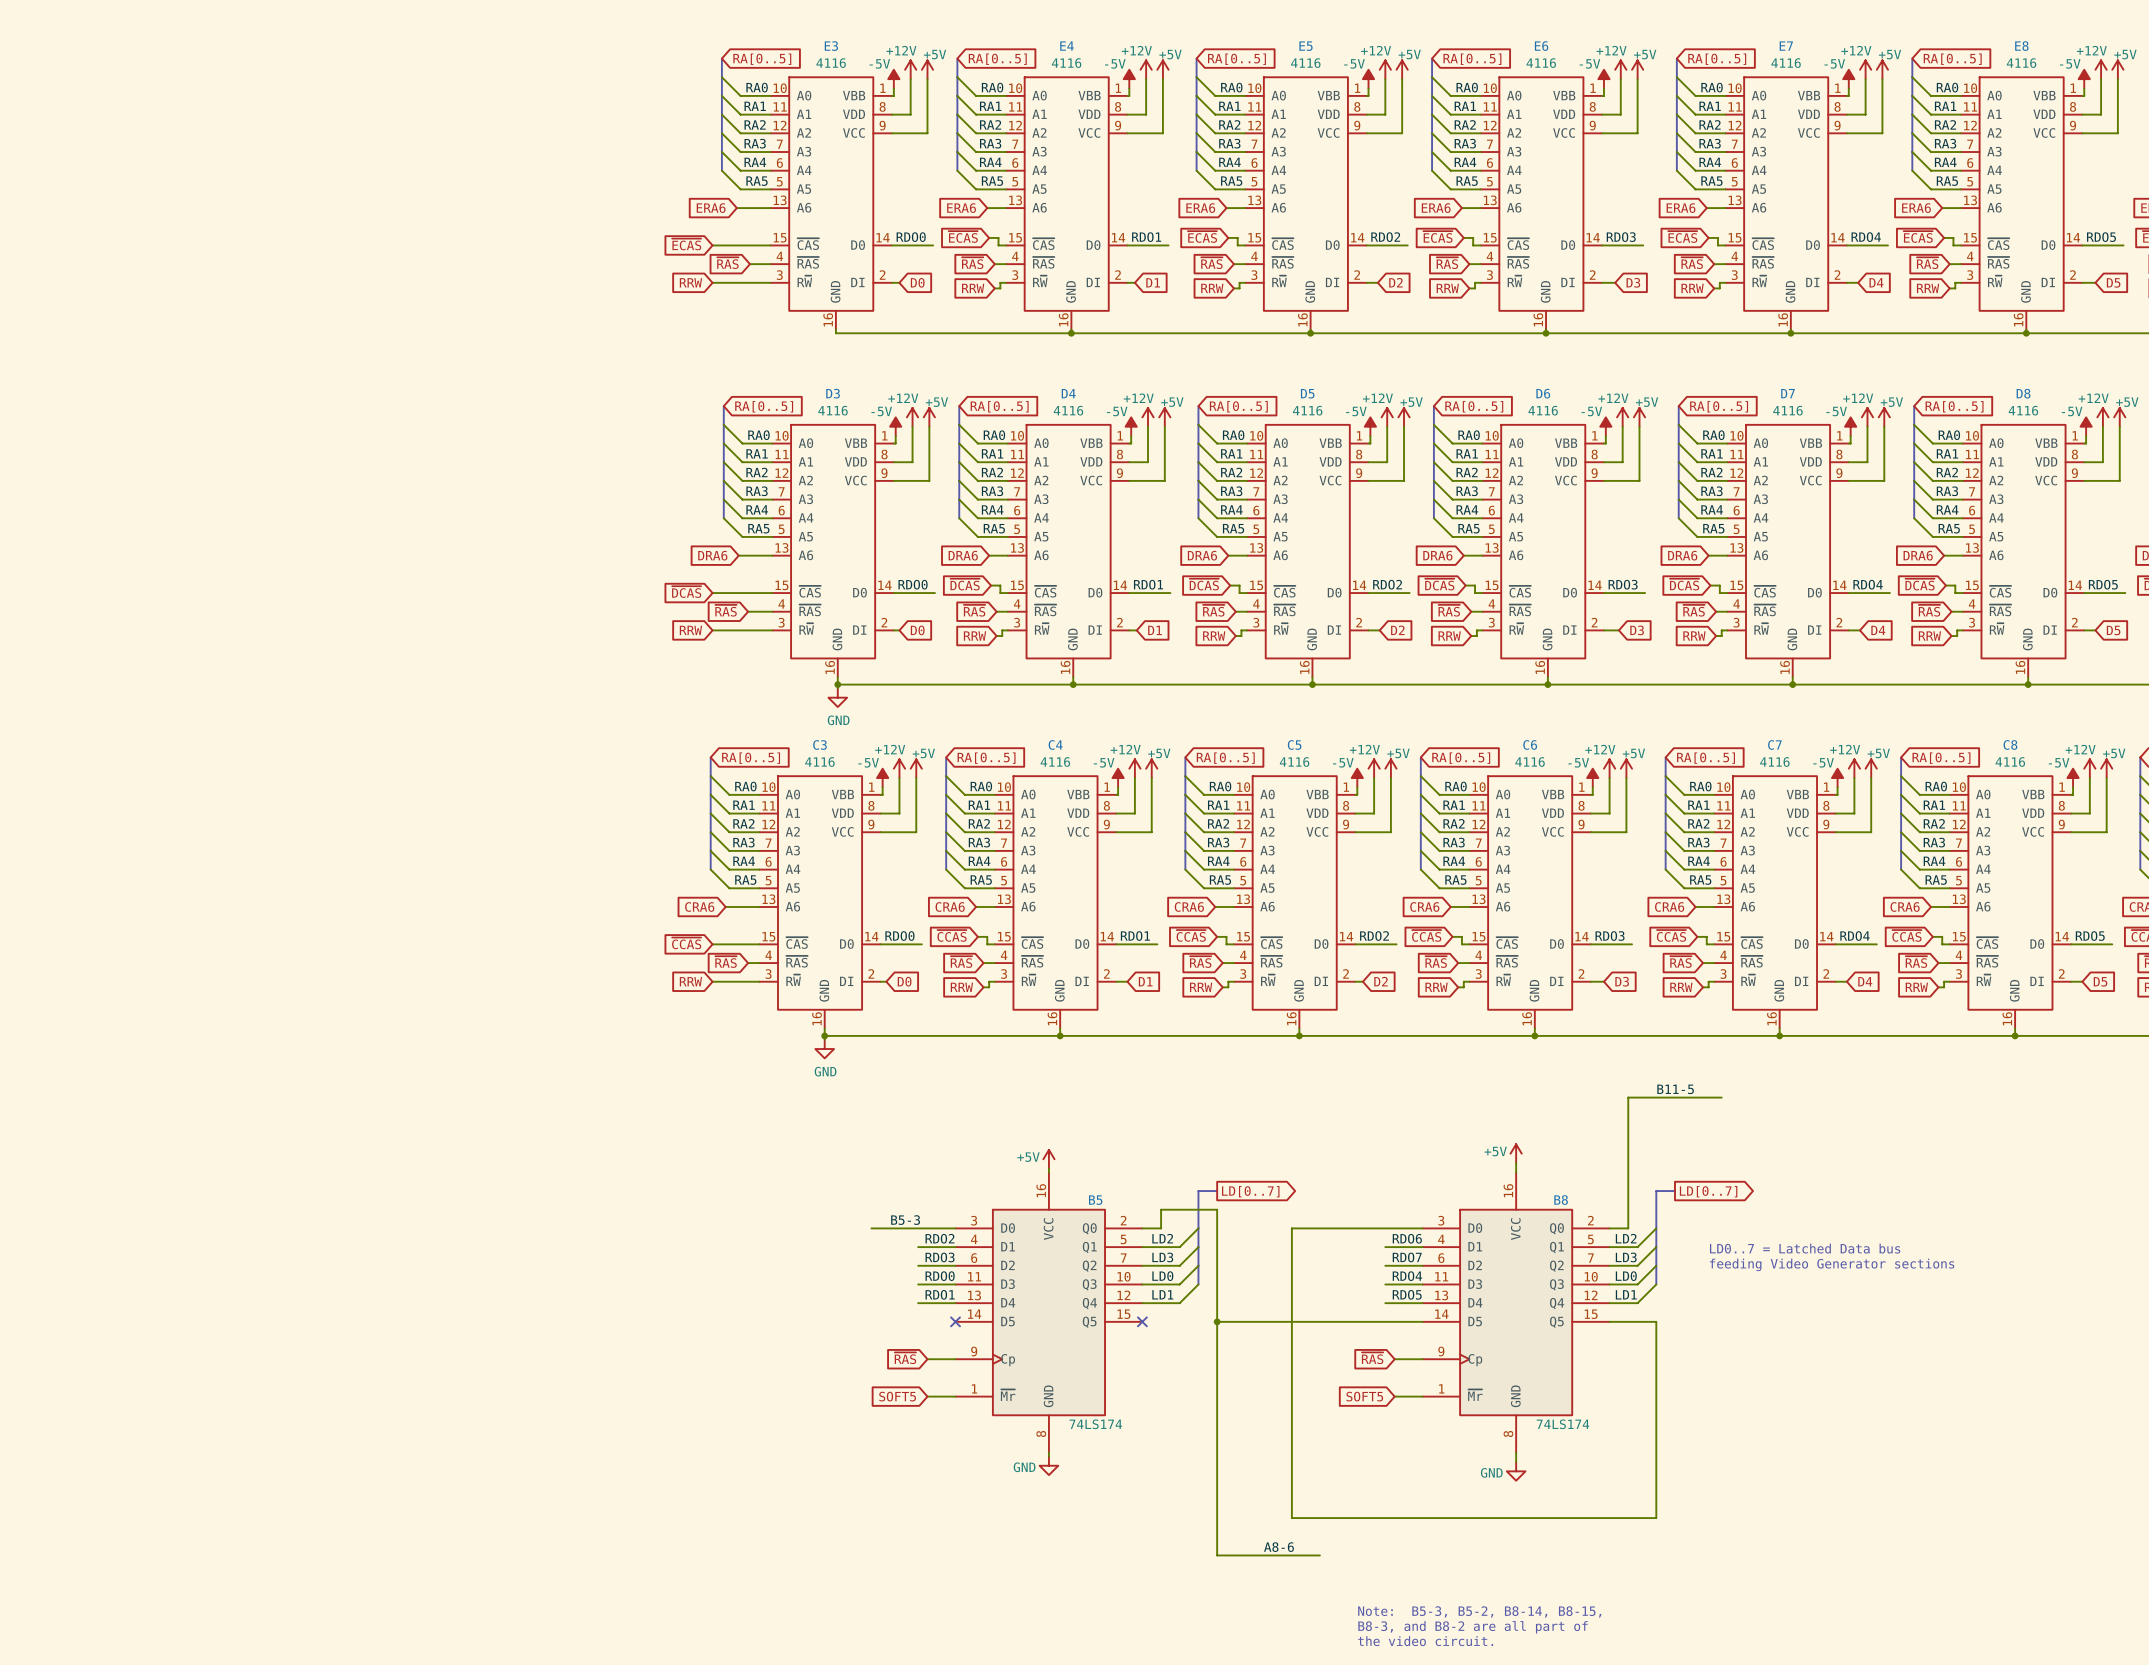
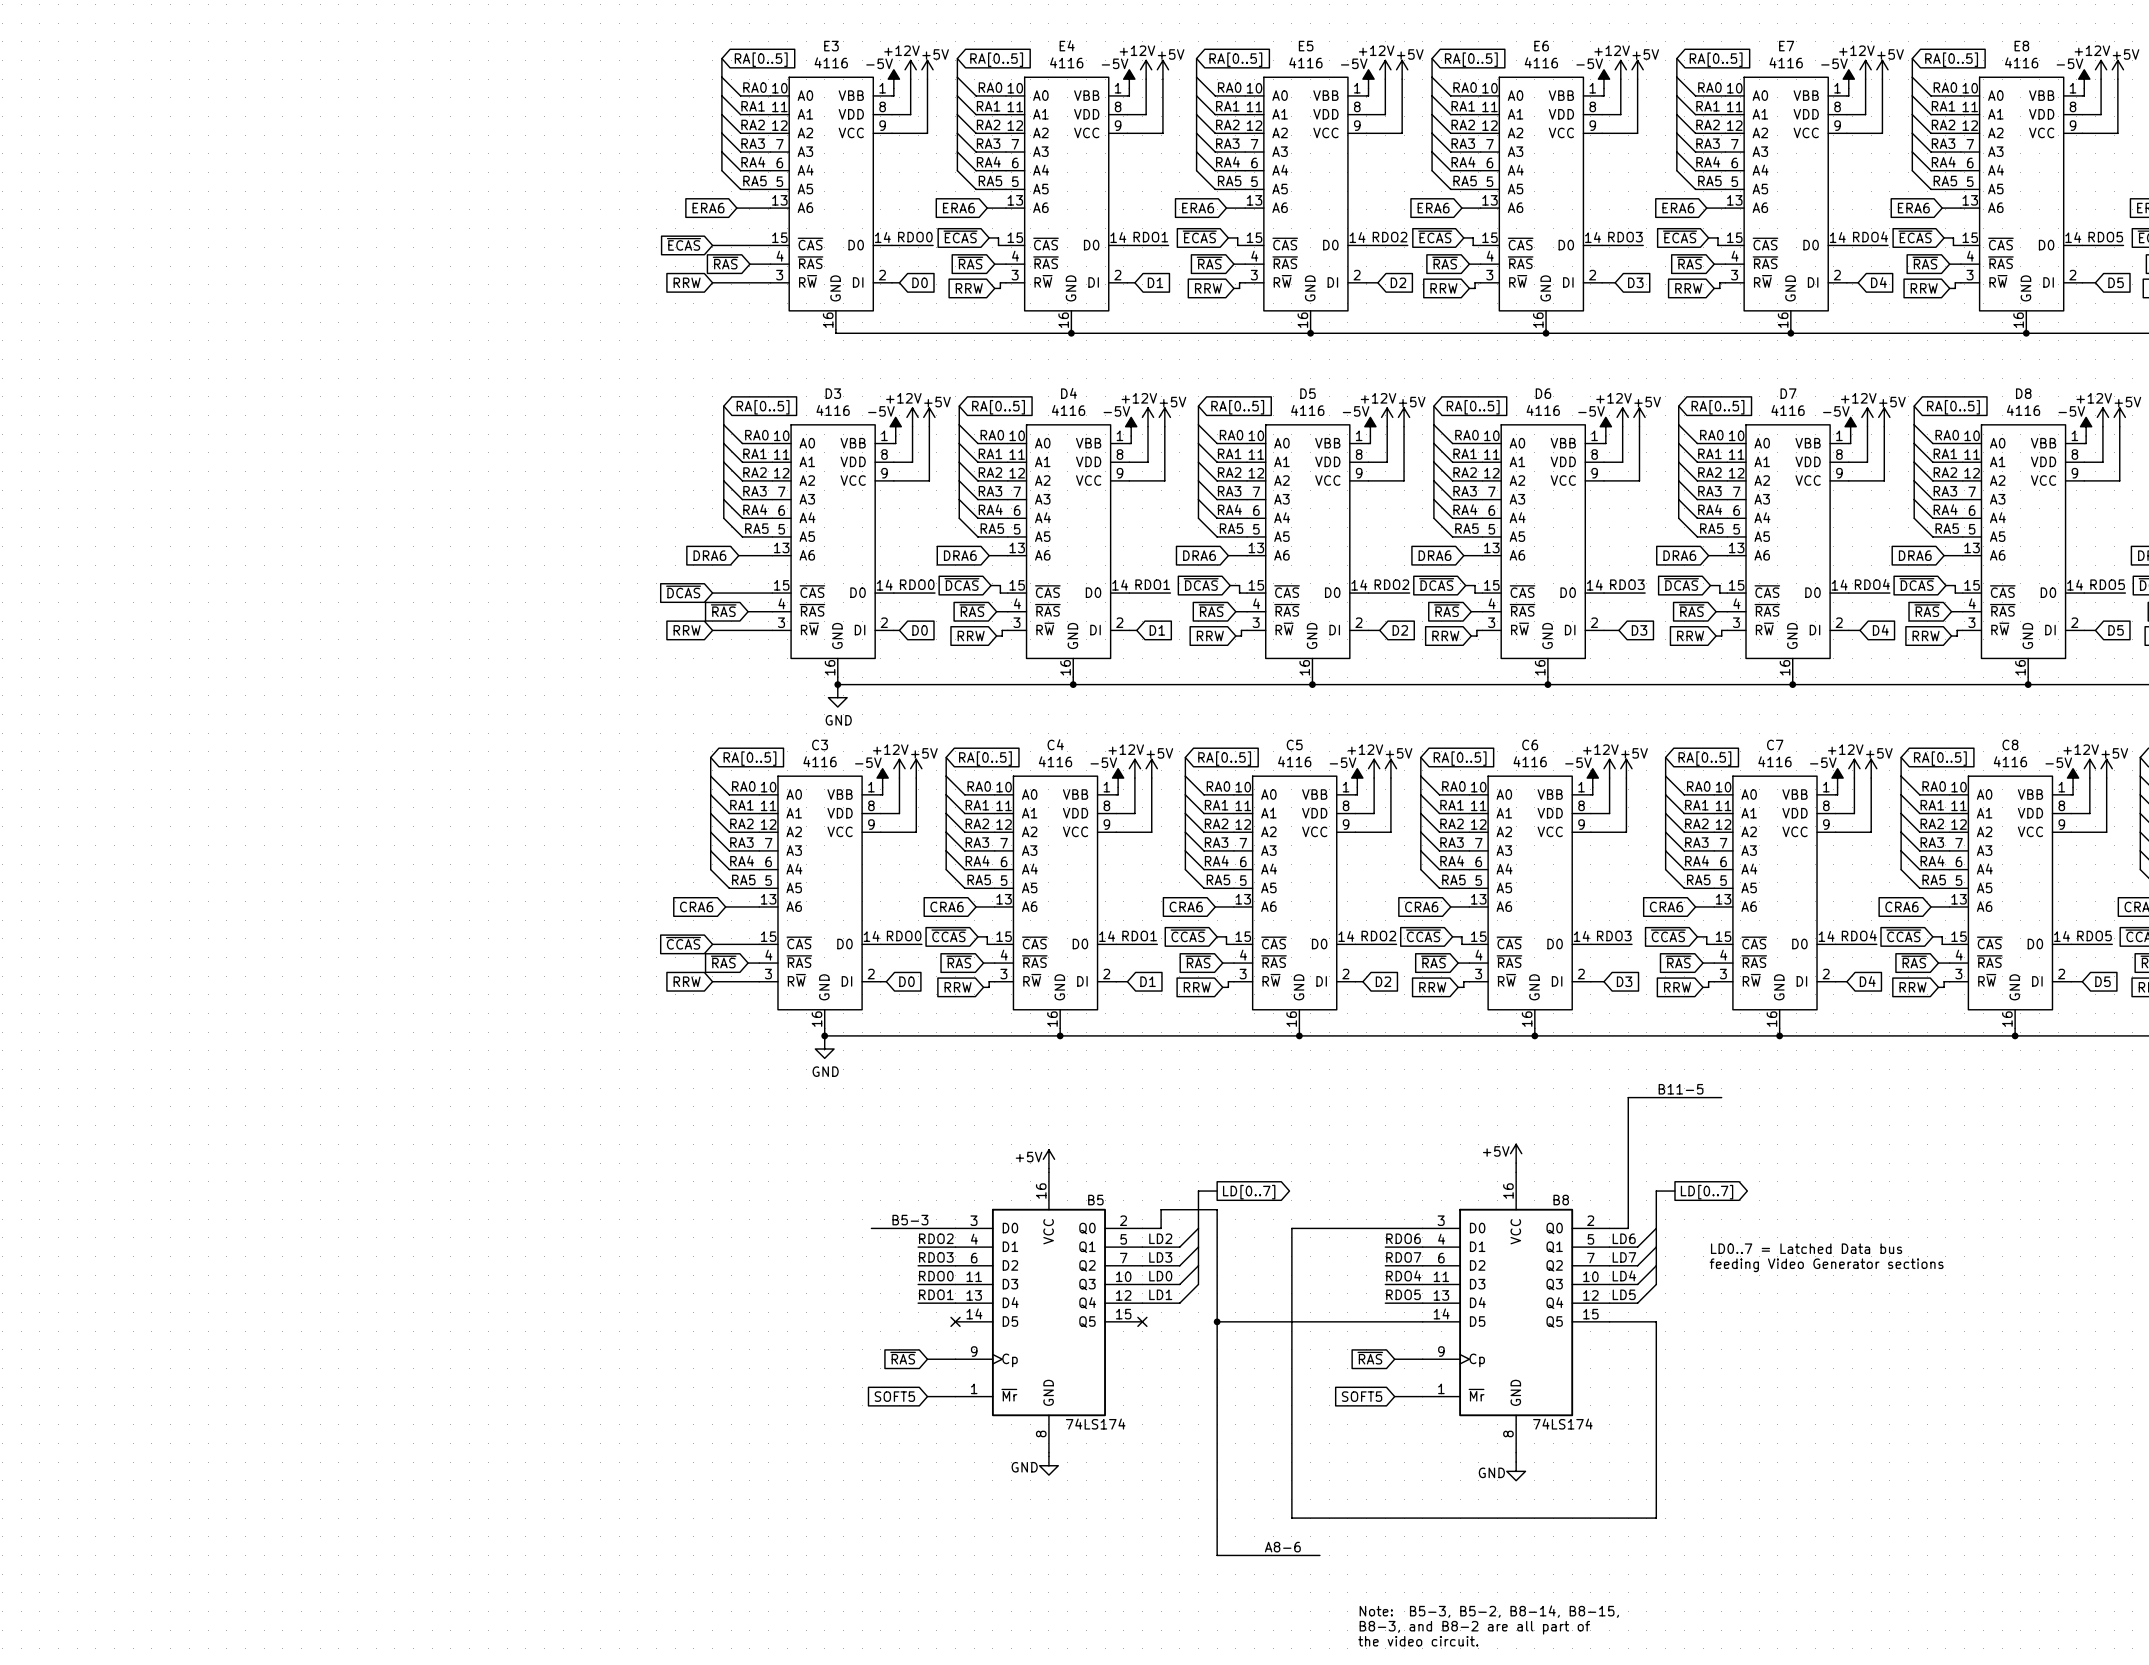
label: LD2 (1626, 1238) -> LD6 (1624, 1238)
label: LD3 (1626, 1257) -> LD7 (1624, 1257)
label: LD0 (1626, 1276) -> LD4 (1624, 1275)
label: LD1 (1626, 1294) -> LD5 (1624, 1294)

